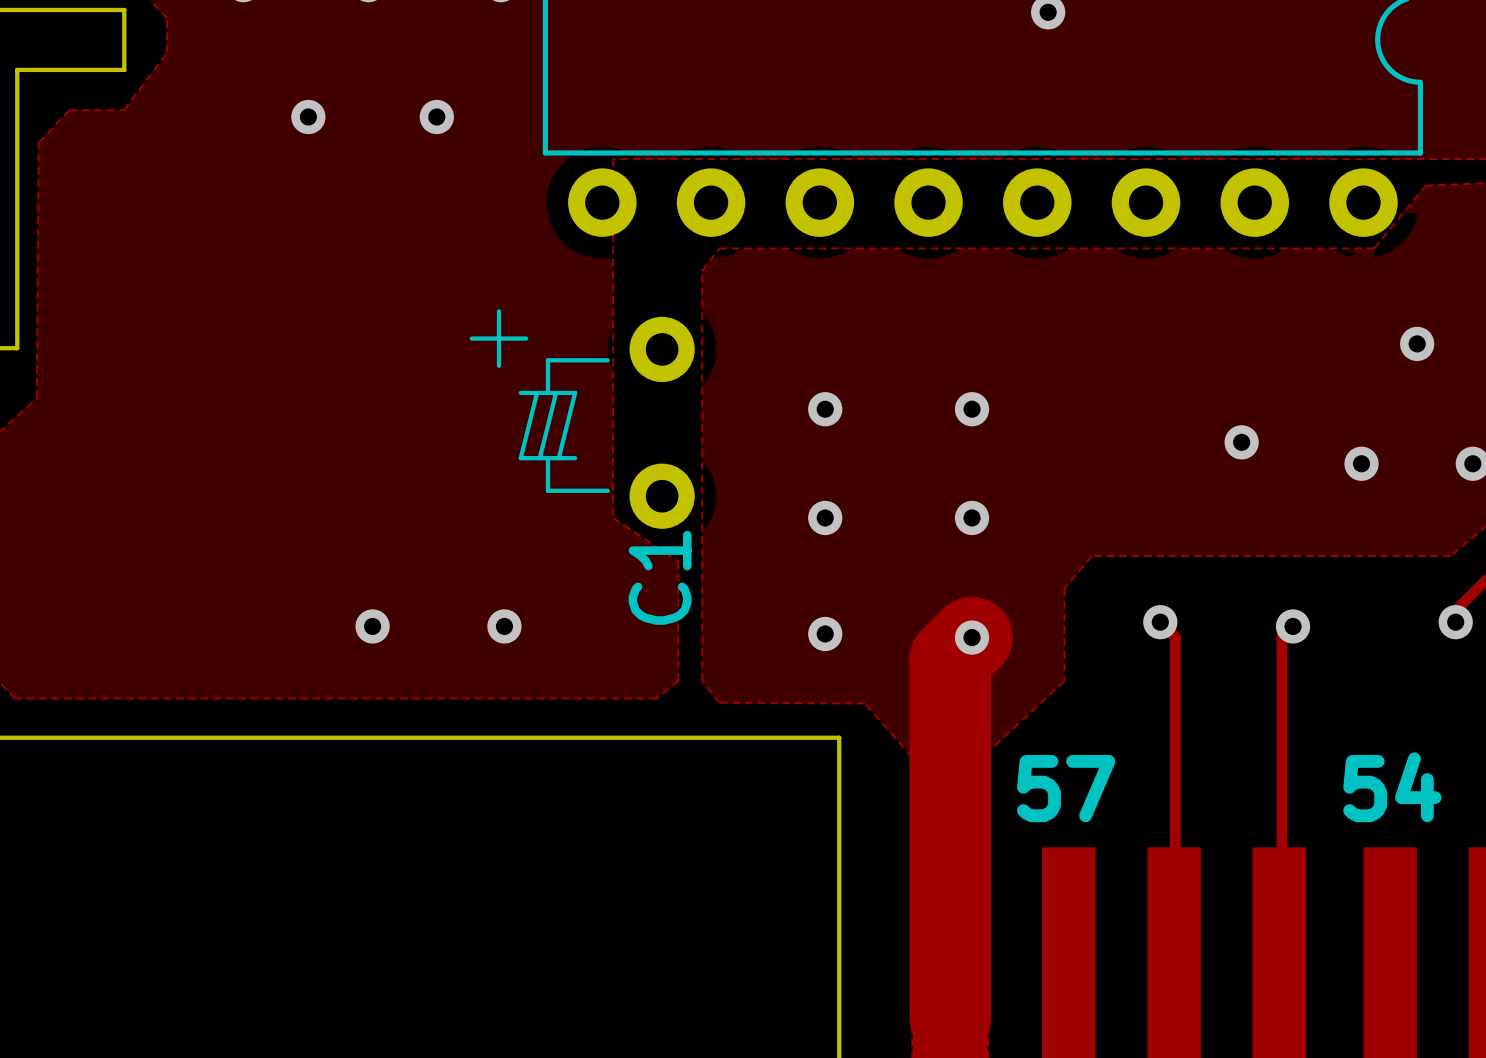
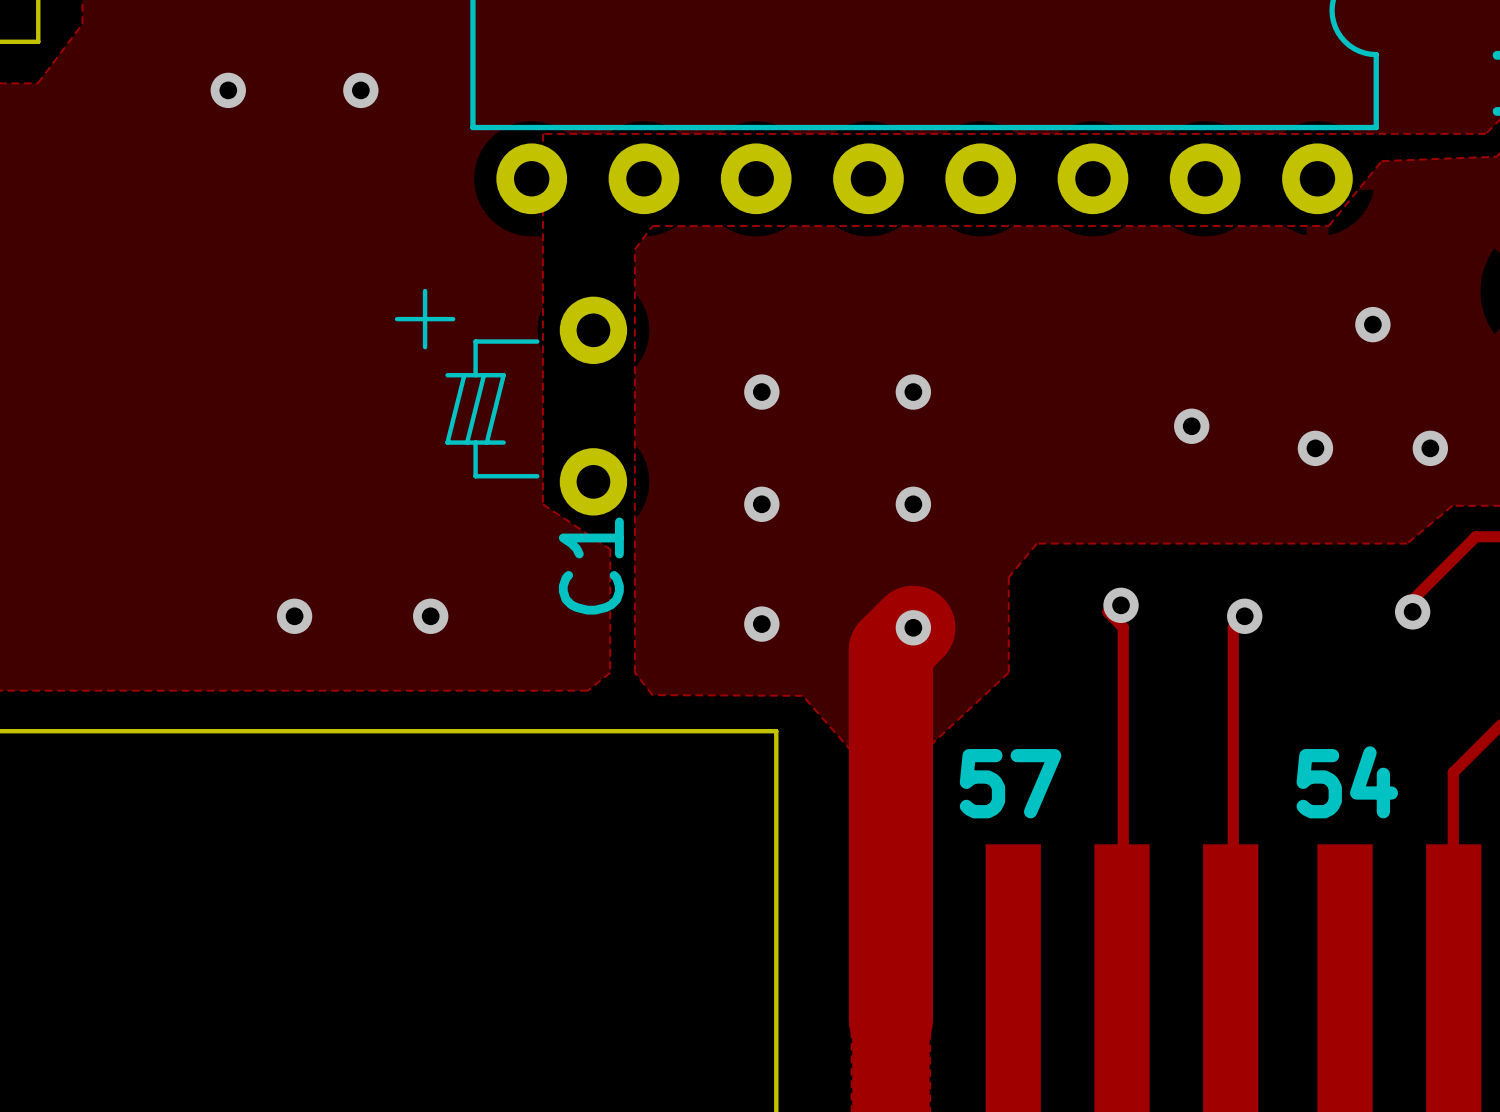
via position: (1160, 622) -> (1121, 605)

